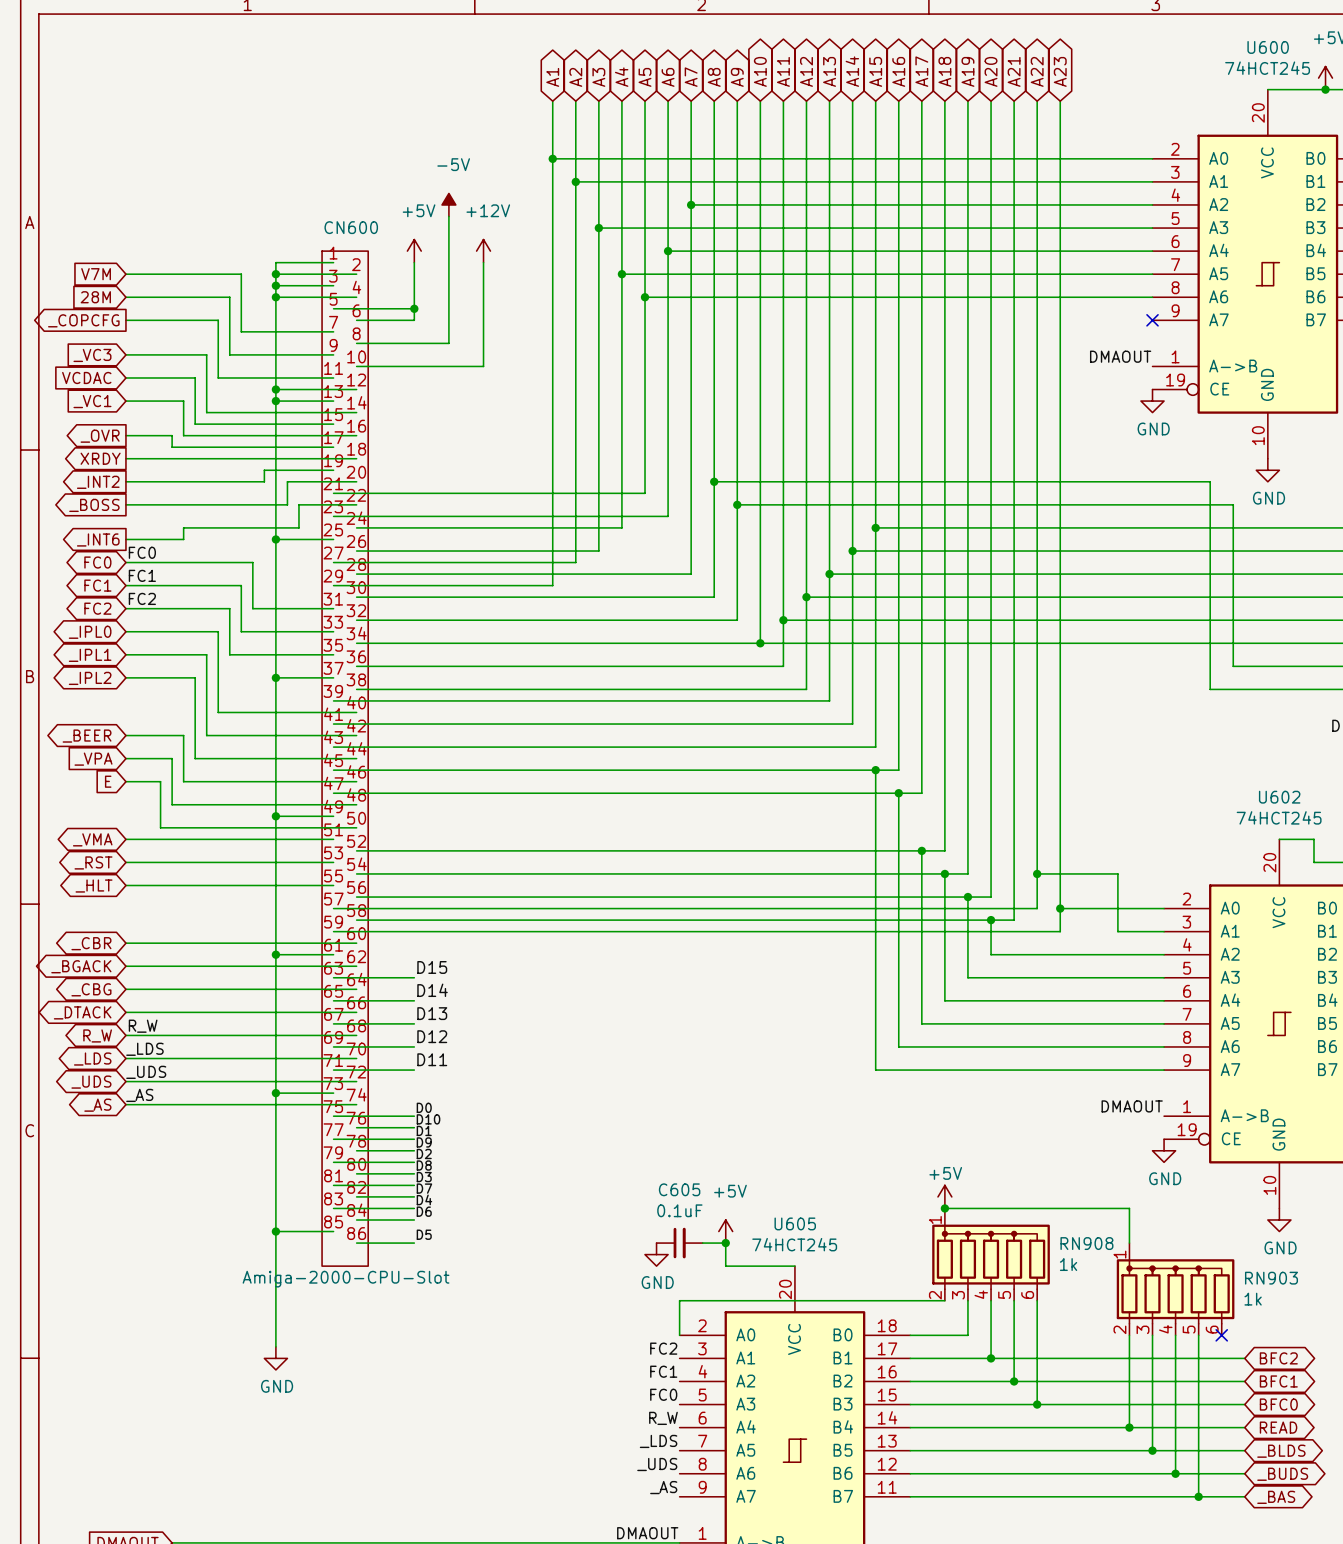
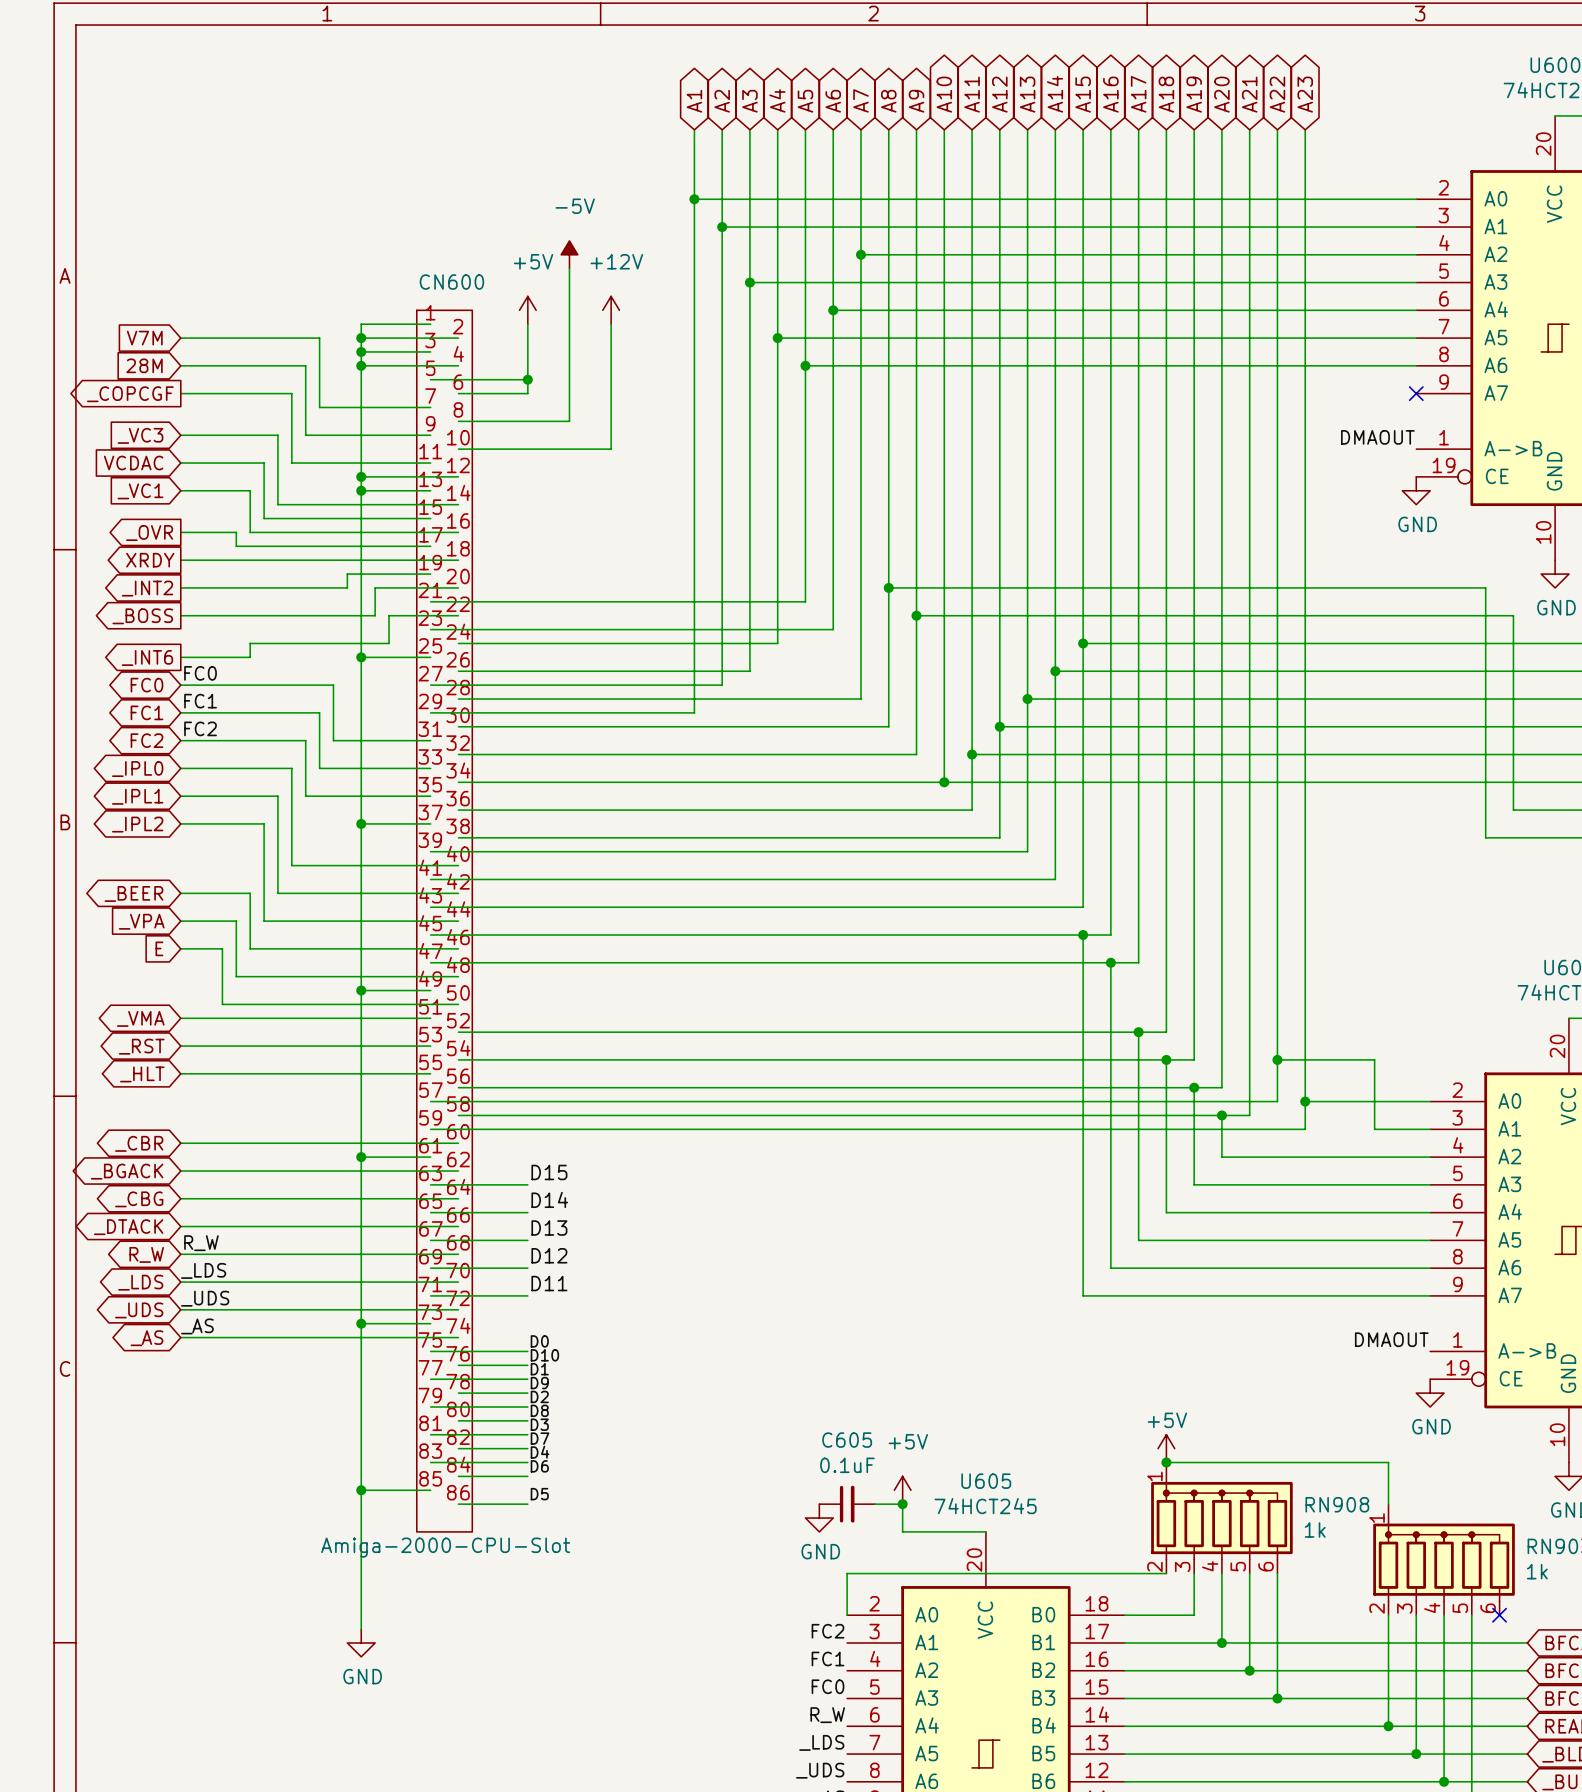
global label: _COPCFG (83, 320) -> _COPCGF (130, 394)

